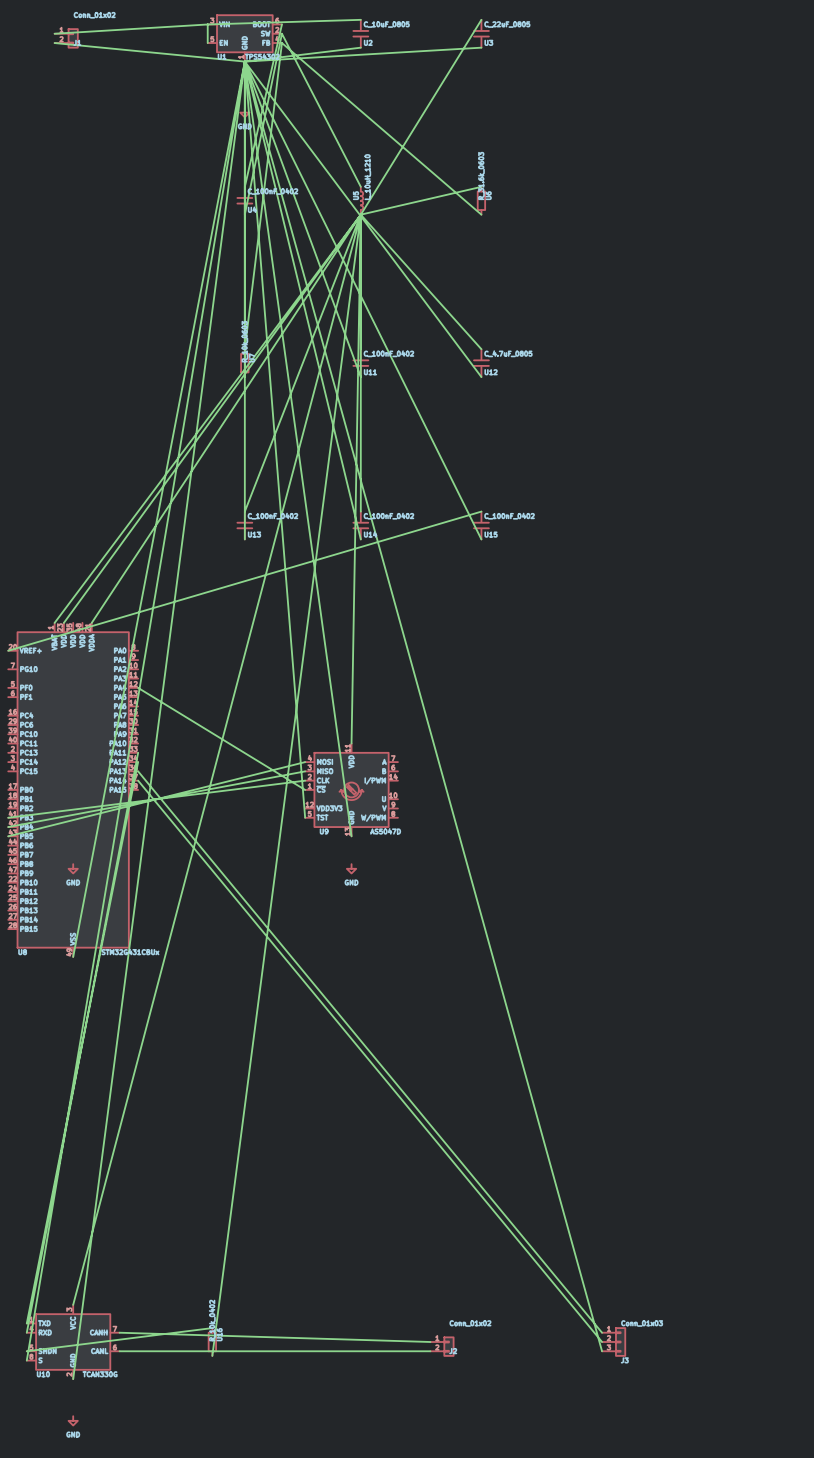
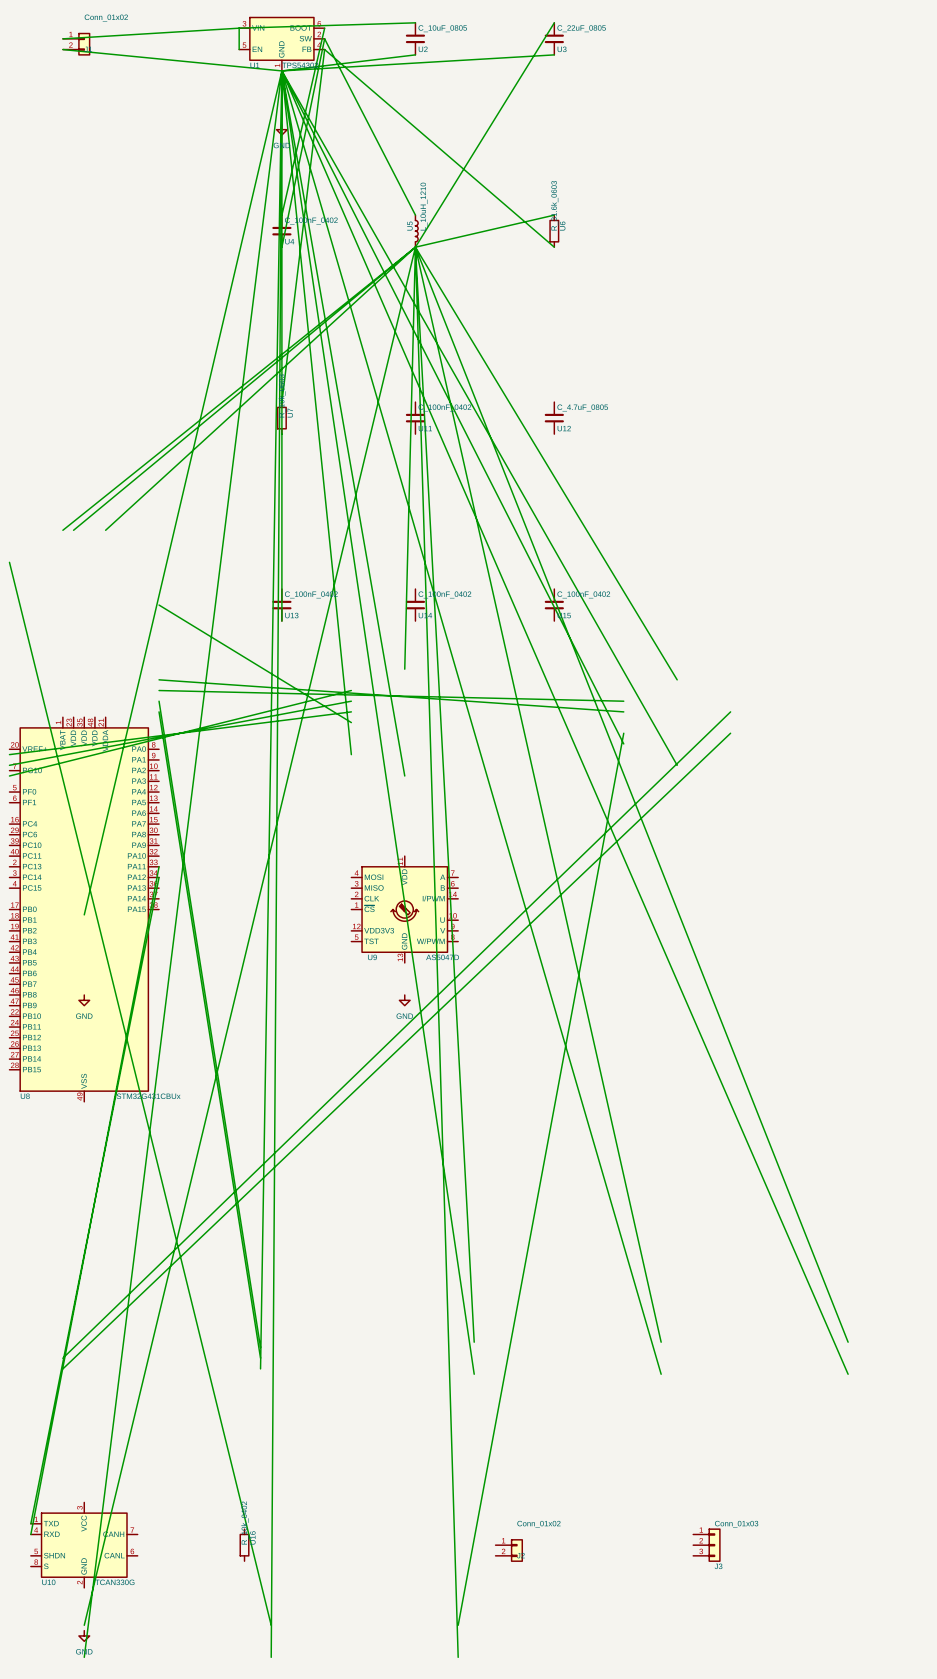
wire: (244, 61) (73, 1379) -> (281, 70) (84, 1657)
wire: (244, 61) (481, 539) -> (281, 70) (623, 743)
wire: (244, 61) (360, 539) -> (281, 70) (351, 754)
wire: (244, 61) (305, 817) -> (281, 70) (404, 775)
wire: (244, 61) (602, 1351) -> (281, 70) (661, 1374)
wire: (244, 61) (73, 956) -> (281, 70) (84, 914)
wire: (244, 61) (26, 1360) -> (281, 70) (271, 1657)
wire: (244, 61) (351, 836) -> (281, 70) (677, 765)
wire: (244, 61) (360, 377) -> (281, 70) (474, 1374)
wire: (244, 61) (481, 377) -> (281, 70) (260, 1368)
wire: none -> (281, 70) (848, 1374)
wire: (360, 214) (360, 511) -> (415, 247) (404, 669)
wire: (360, 214) (73, 1304) -> (415, 247) (84, 1625)
wire: (360, 214) (244, 511) -> (415, 247) (105, 530)
wire: (360, 214) (63, 622) -> (415, 247) (73, 530)
wire: (360, 214) (54, 622) -> (415, 247) (62, 530)
wire: (360, 214) (212, 1355) -> (415, 247) (458, 1657)
wire: (360, 214) (481, 349) -> (415, 247) (677, 679)
wire: (360, 214) (351, 743) -> (415, 247) (474, 1342)
wire: (360, 214) (91, 622) -> (415, 247) (661, 1342)
wire: none -> (415, 247) (848, 1342)
wire: none -> (9, 562) (271, 1625)
wire: (481, 511) (8, 650) -> none
wire: none -> (159, 605) (351, 722)
wire: none -> (159, 679) (623, 711)
wire: none -> (159, 690) (623, 701)
wire: none -> (351, 690) (9, 775)
wire: none -> (159, 701) (260, 1347)
wire: none -> (351, 701) (9, 765)
wire: none -> (159, 711) (260, 1358)
wire: none -> (351, 711) (9, 754)
wire: none -> (730, 711) (62, 1358)
wire: none -> (623, 733) (458, 1625)
wire: none -> (730, 733) (62, 1368)
wire: (138, 687) (305, 789) -> none
wire: (305, 762) (8, 836) -> none
wire: (138, 771) (602, 1332) -> none
wire: (305, 771) (8, 827) -> none
wire: (138, 780) (602, 1341) -> none
wire: (305, 780) (8, 817) -> none
wire: (212, 1328) (26, 1351) -> none
wire: (119, 1332) (430, 1341) -> none
wire: (119, 1351) (430, 1351) -> none

